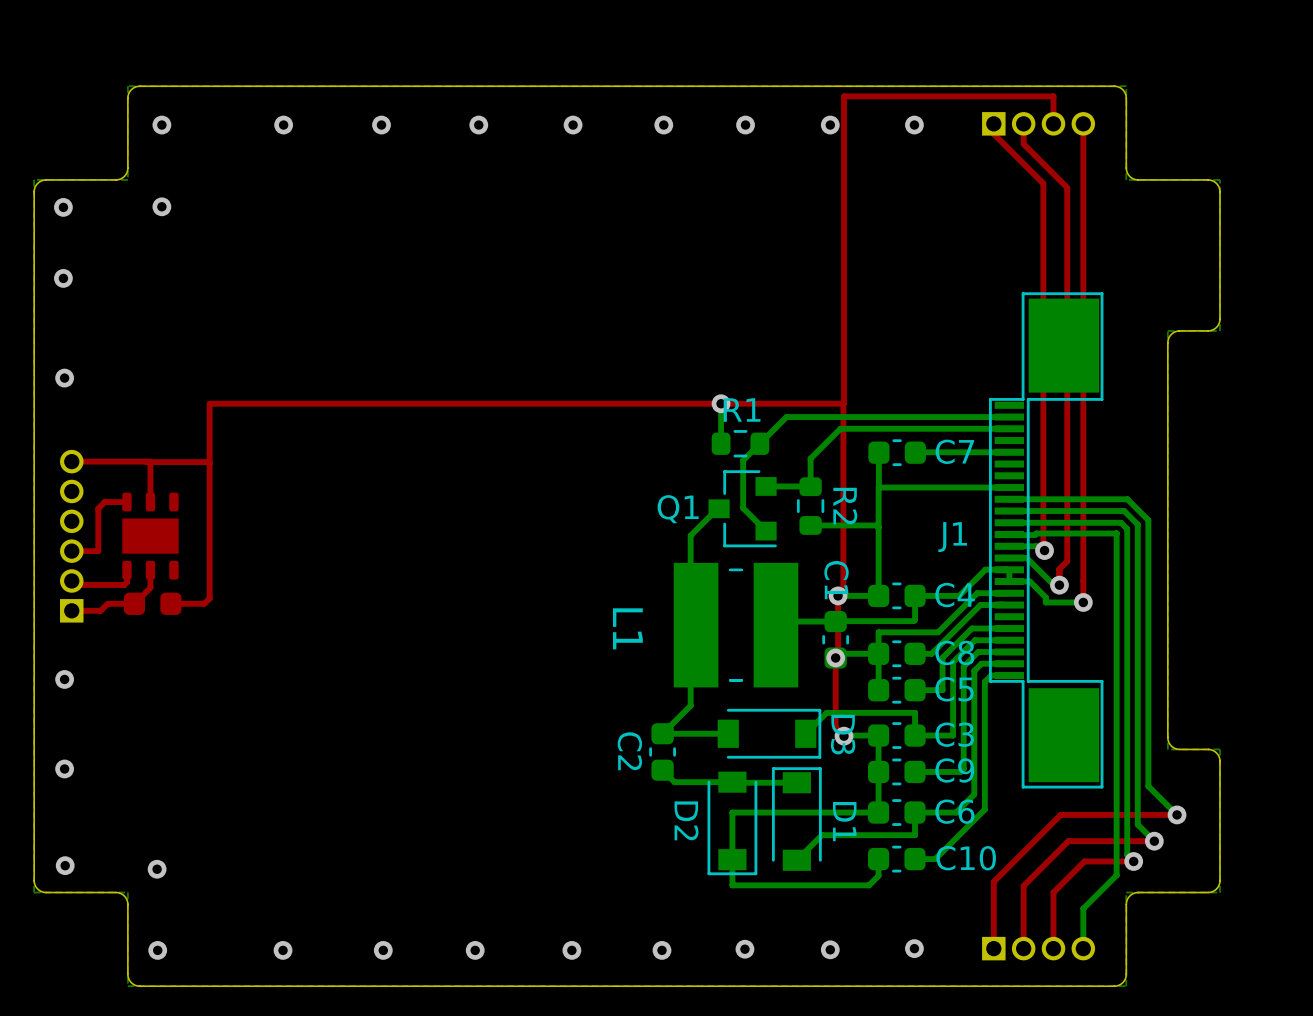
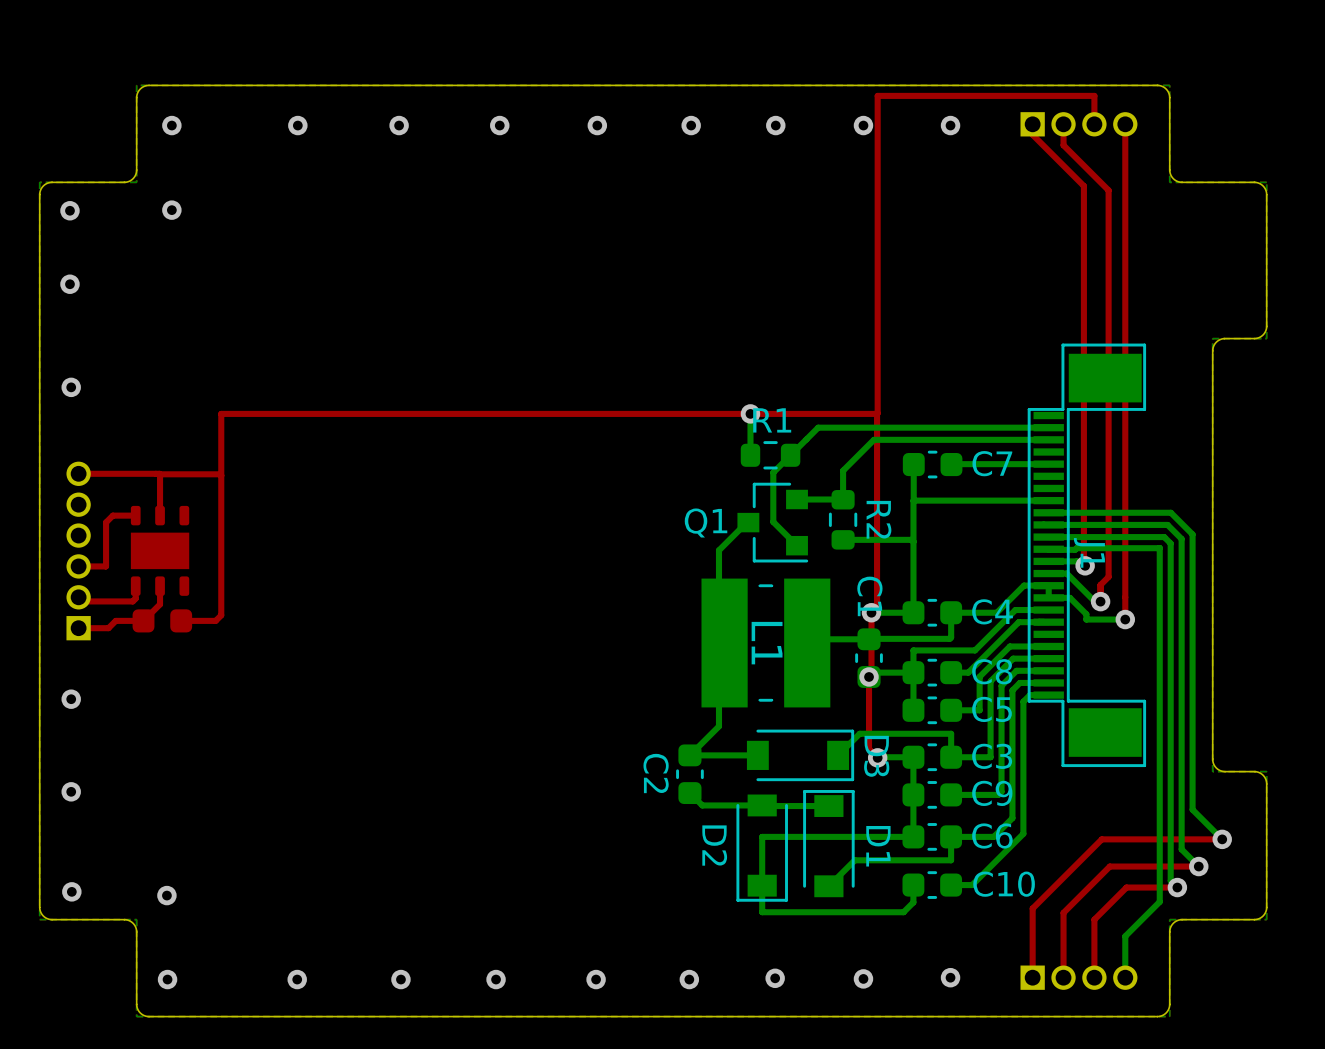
J1 footprint: [989, 292, 1104, 789] -> [1027, 343, 1147, 768]
J1 name position: J1 (952, 537) -> J1 (1089, 552)
L1 name position: L1 (627, 628) -> L1 (767, 643)

